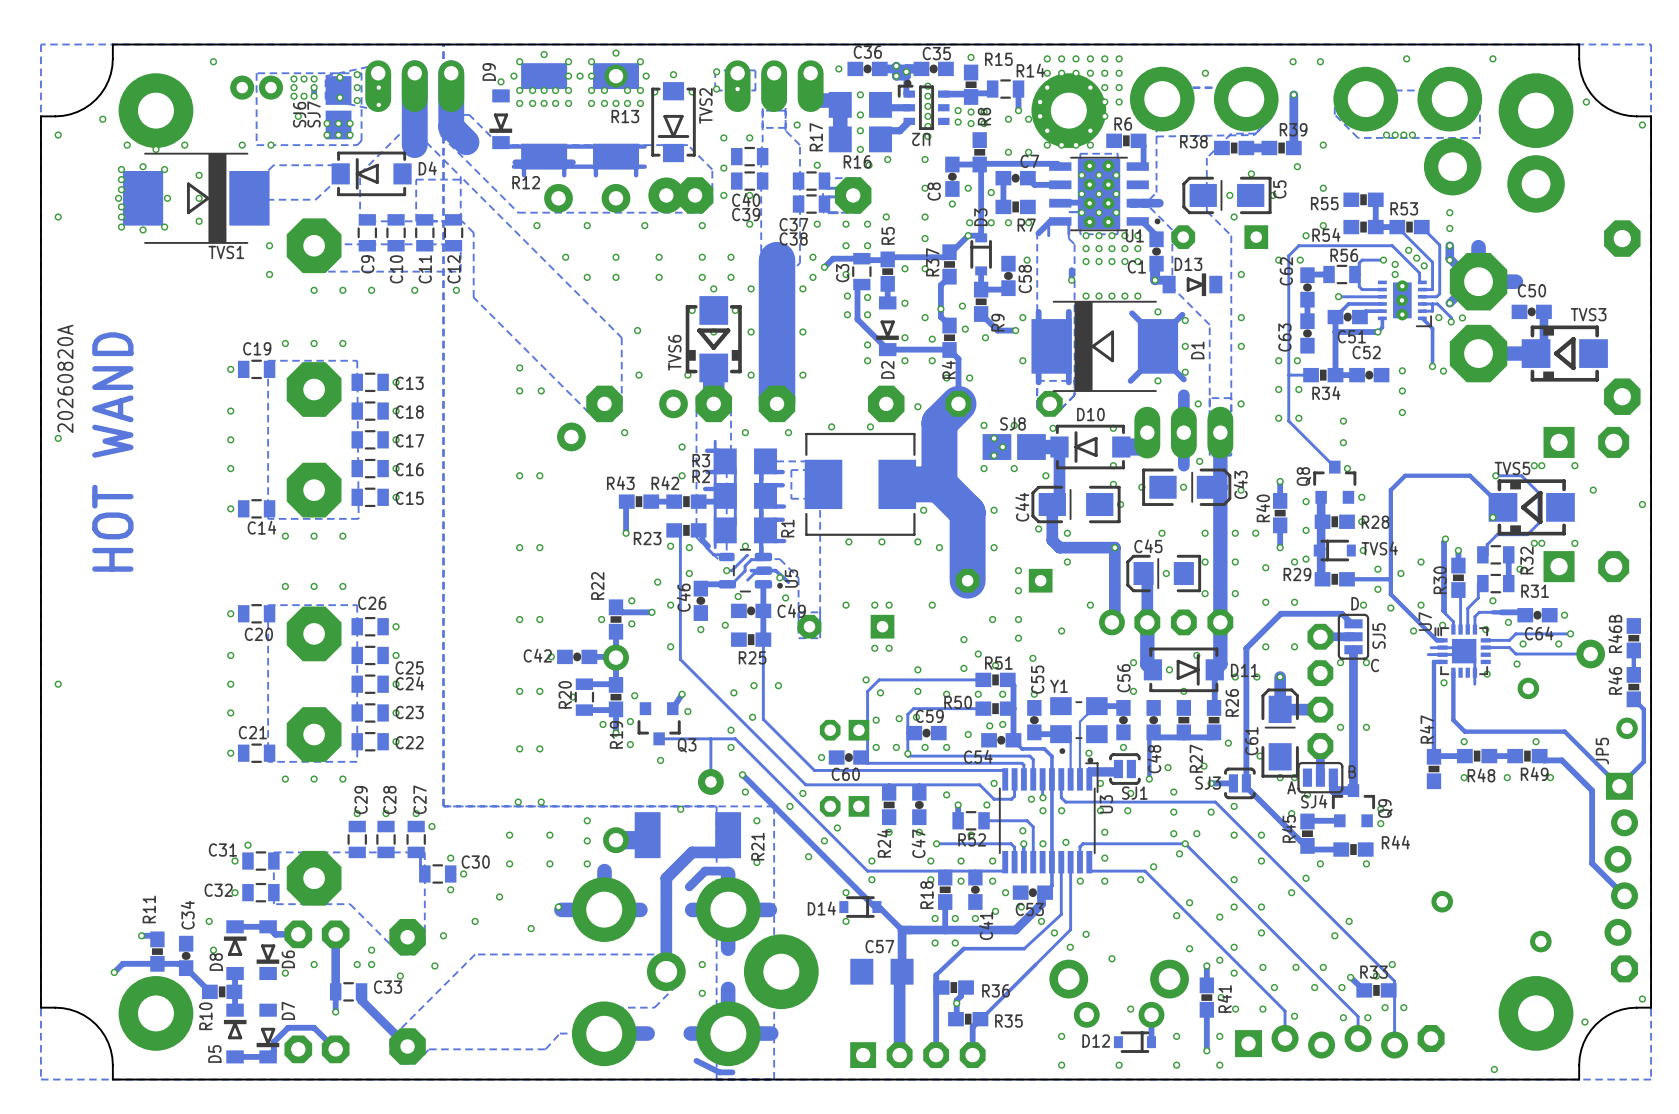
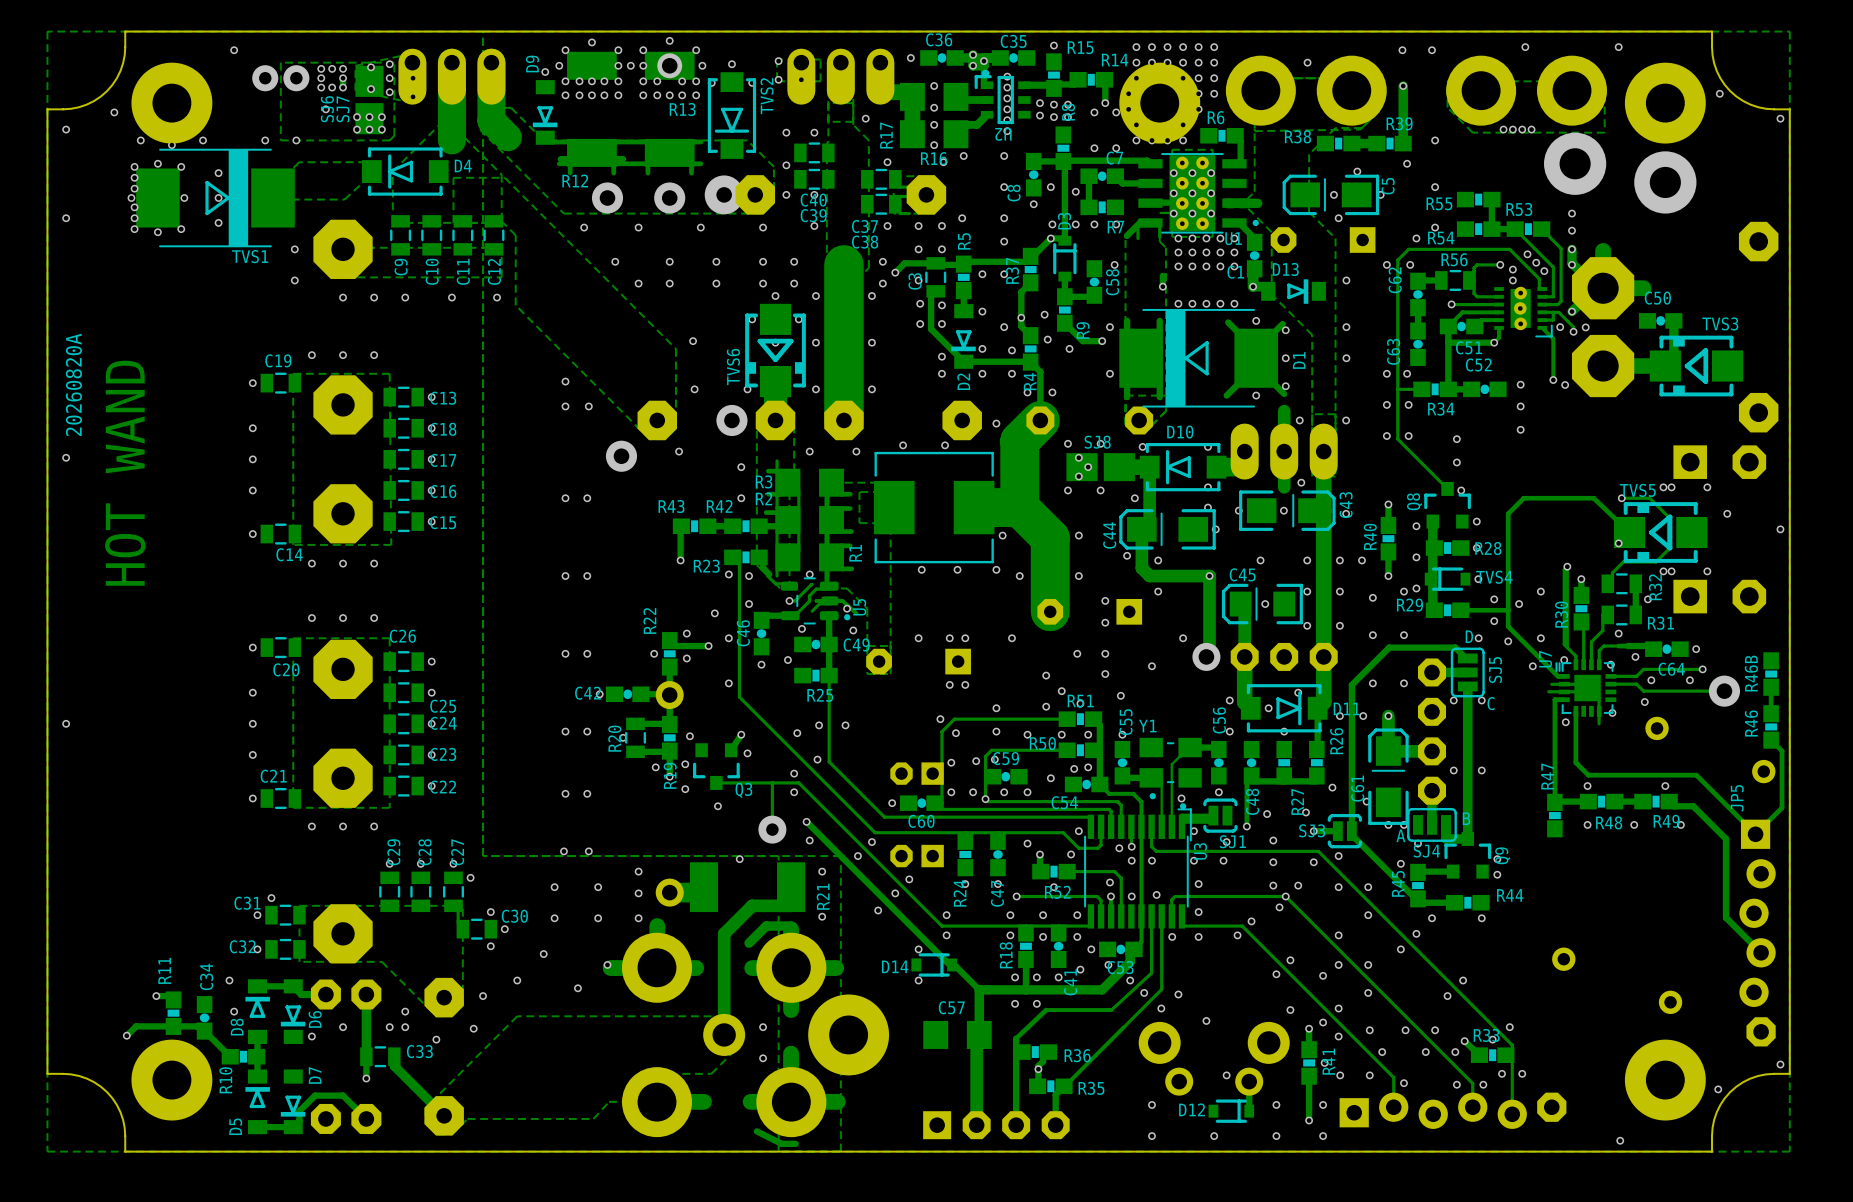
R14 footprint: [986, 79, 1025, 99] -> [1069, 72, 1114, 88]
R52 footprint: [952, 811, 990, 831] -> [1032, 863, 1076, 880]

